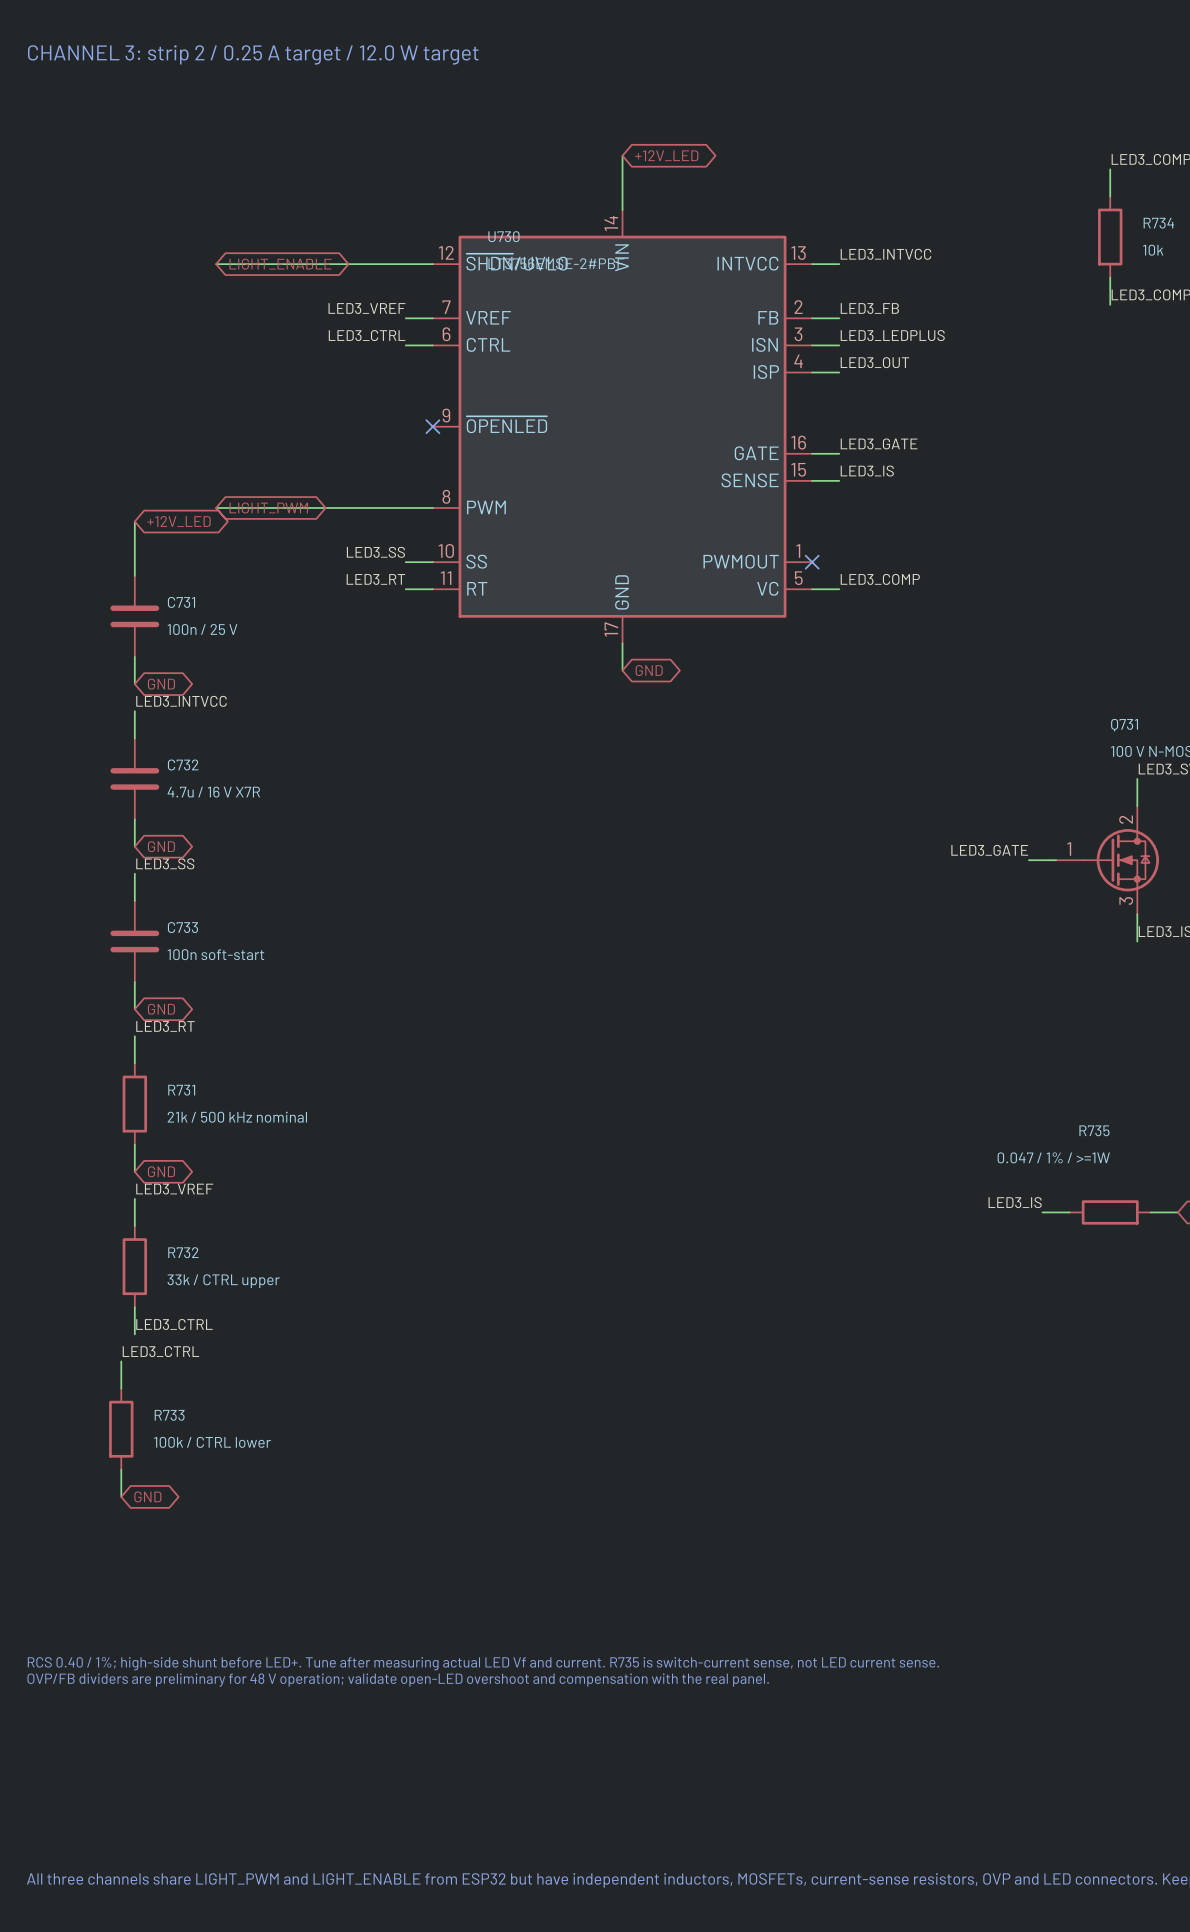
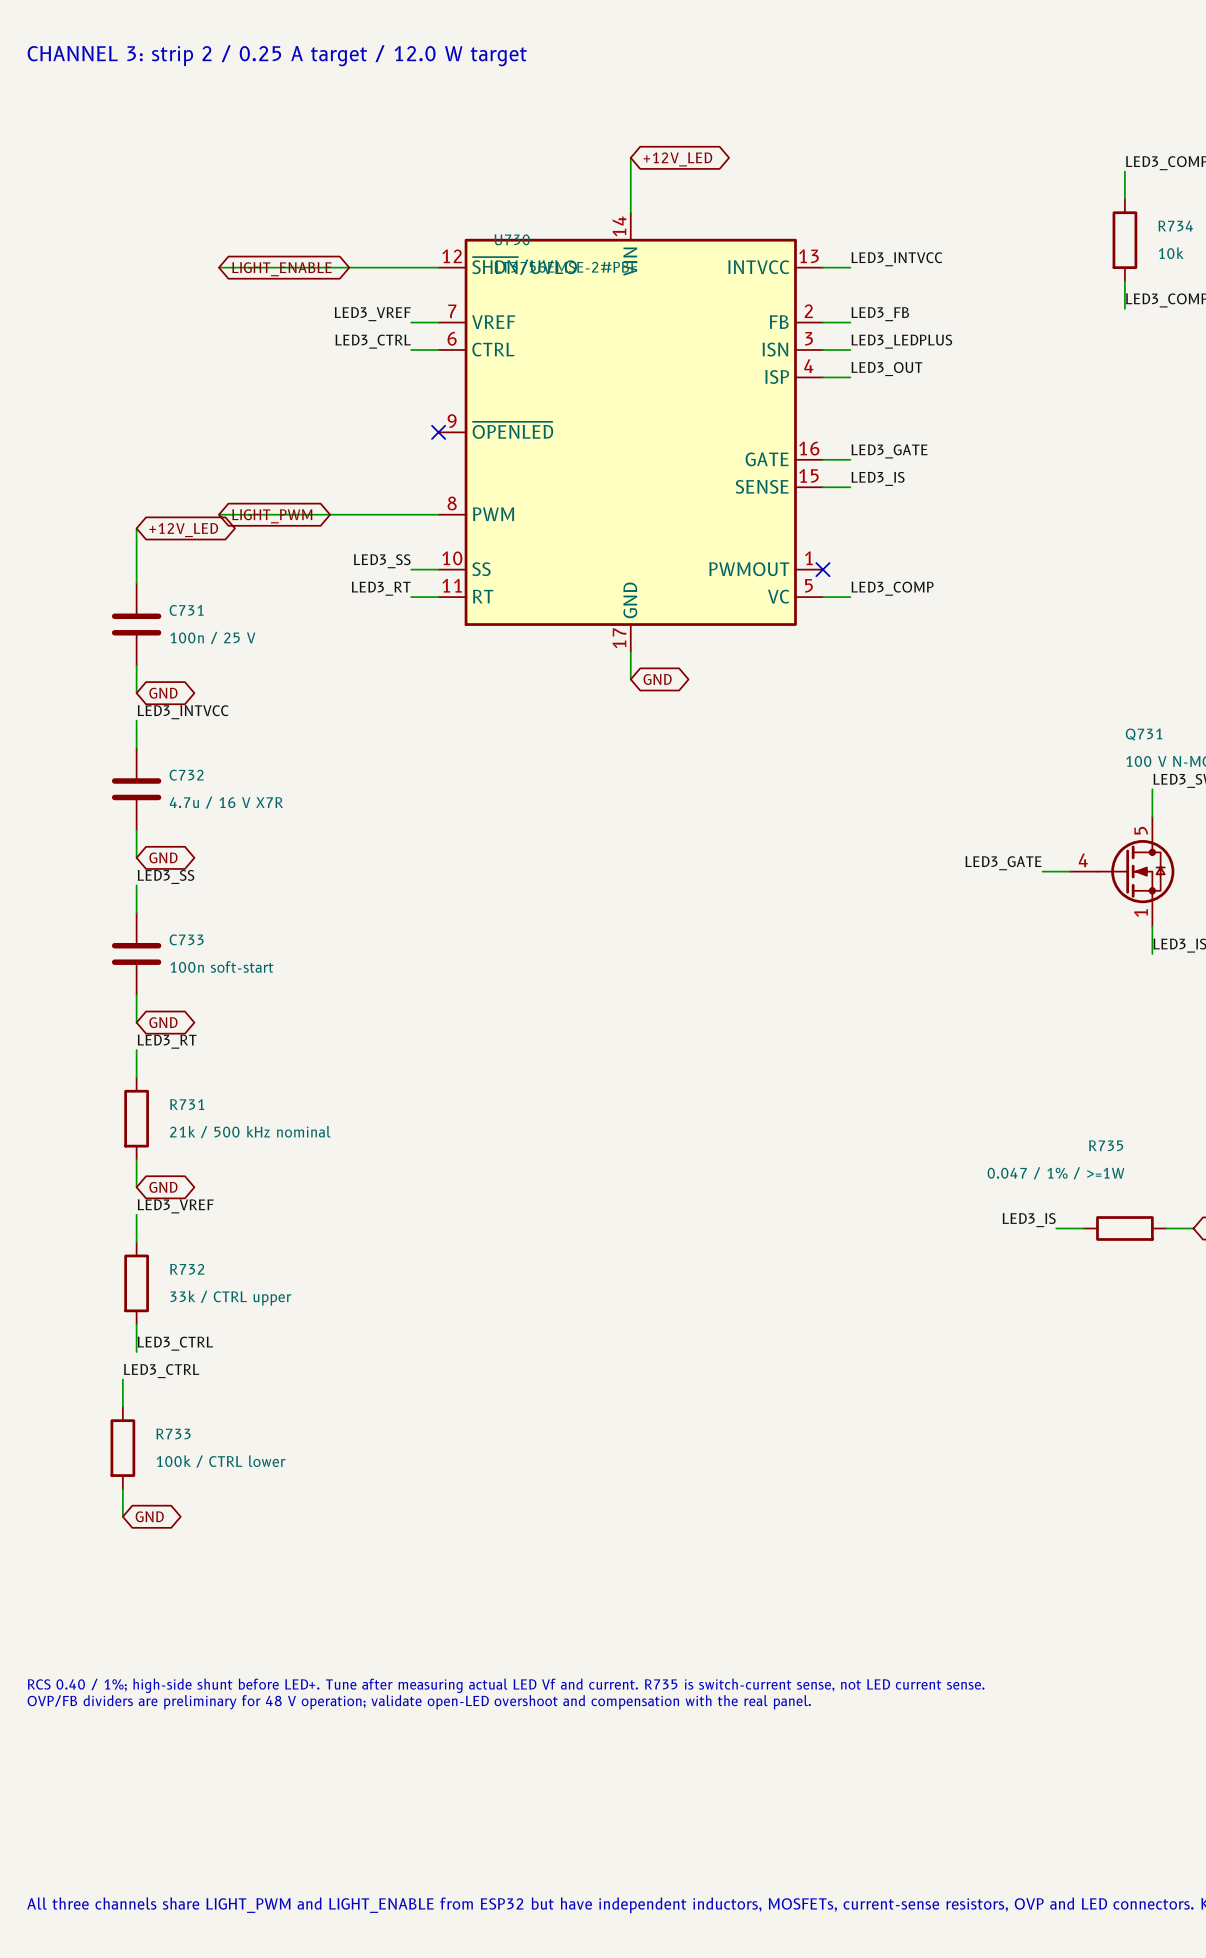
Q731 pin number: 2 (1126, 819) -> 5 (1141, 830)
Q731 pin number: 1 (1069, 849) -> 4 (1083, 860)
Q731 pin number: 3 (1126, 901) -> 1 (1141, 913)

